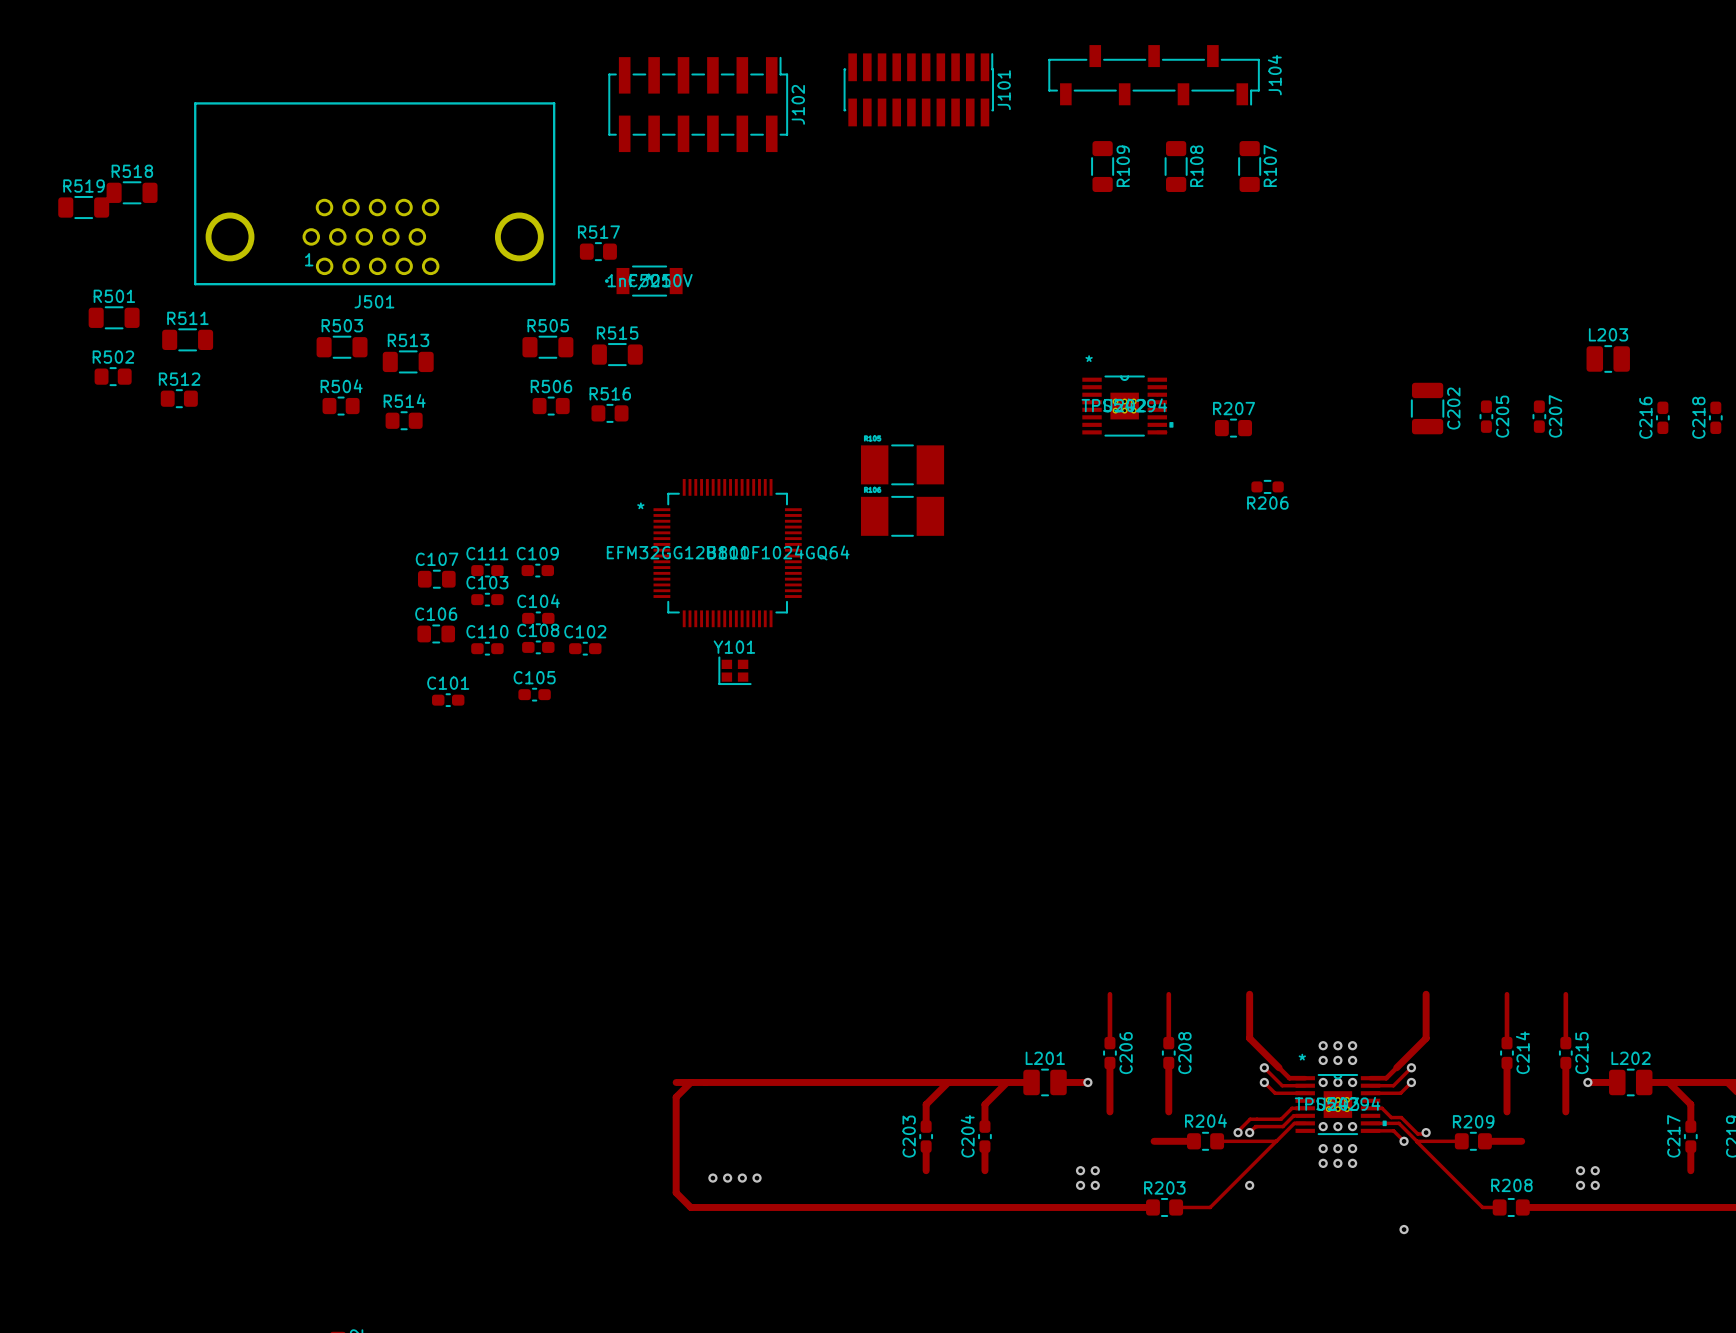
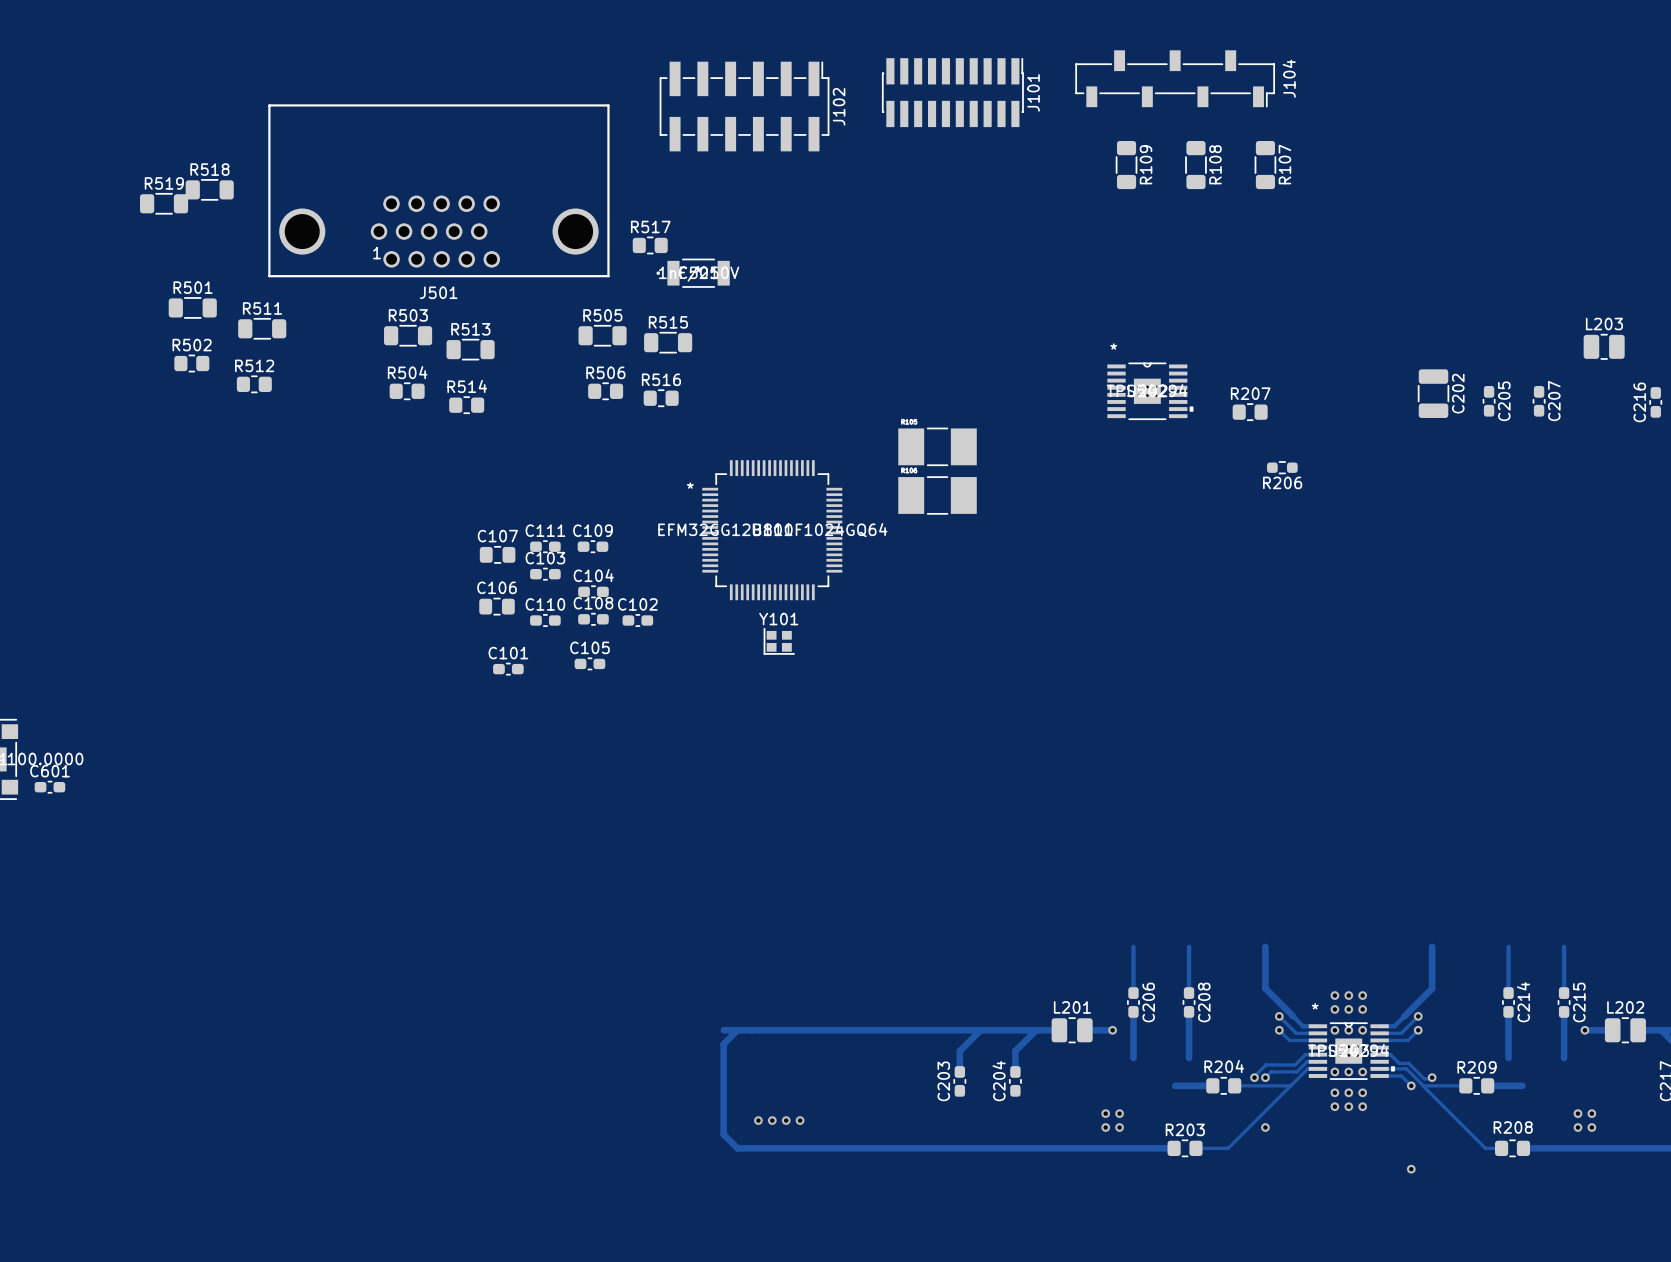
track: (926, 1146) (926, 1170) -> none
track: (984, 1146) (984, 1170) -> none

